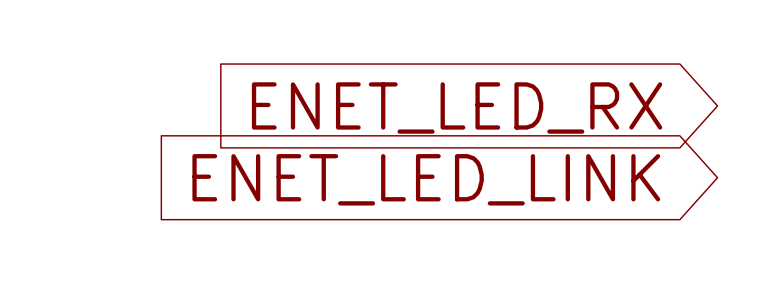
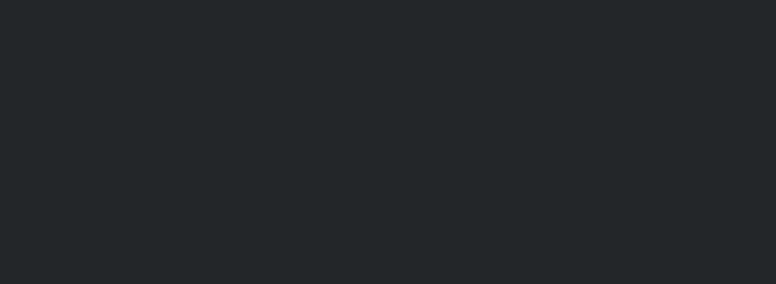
global label: ENET_LED_RX (457, 108) -> none
global label: ENET_LED_LINK (426, 179) -> none

